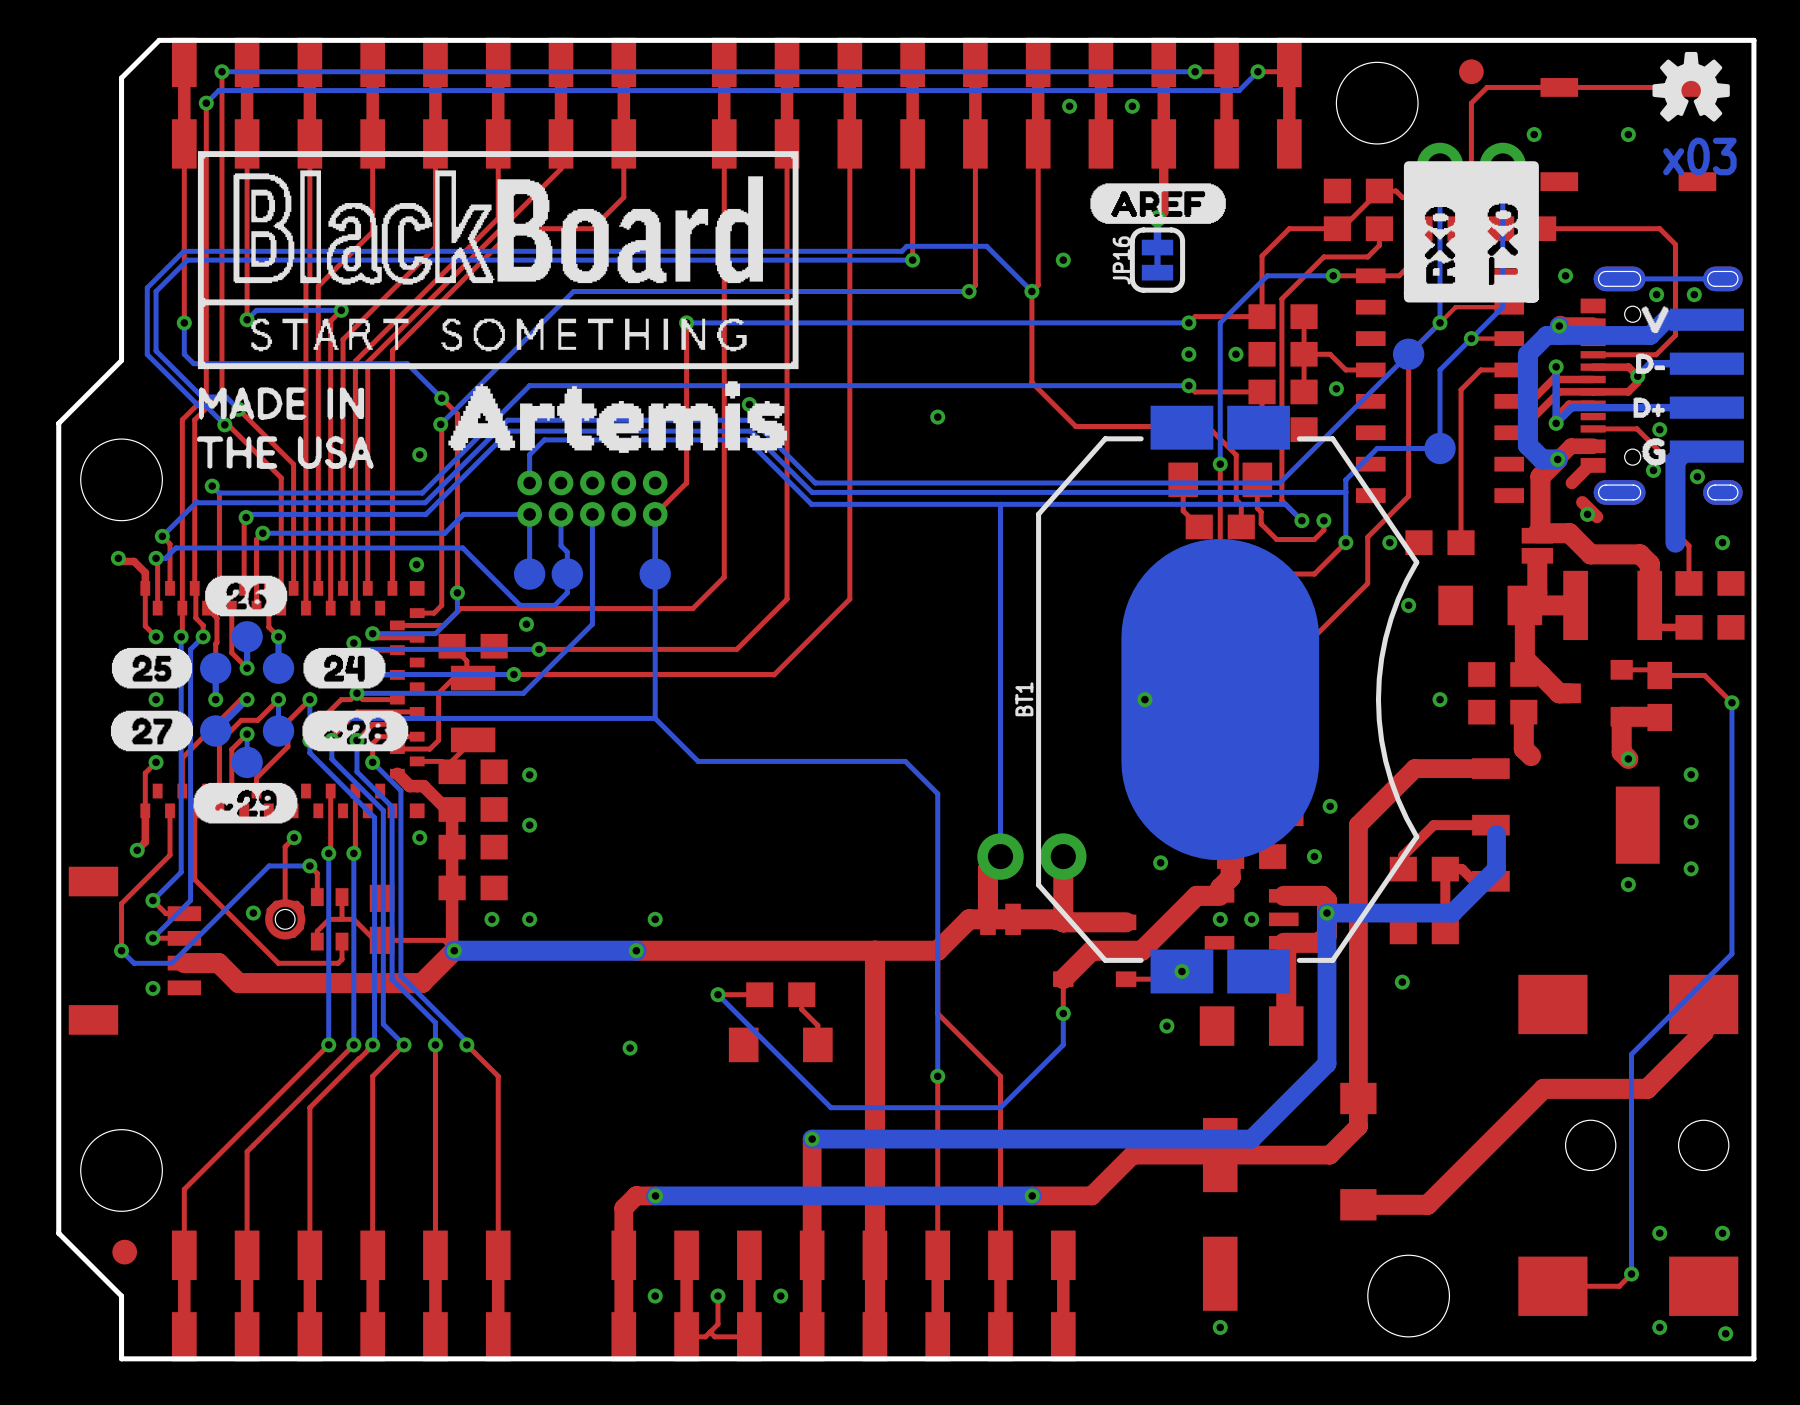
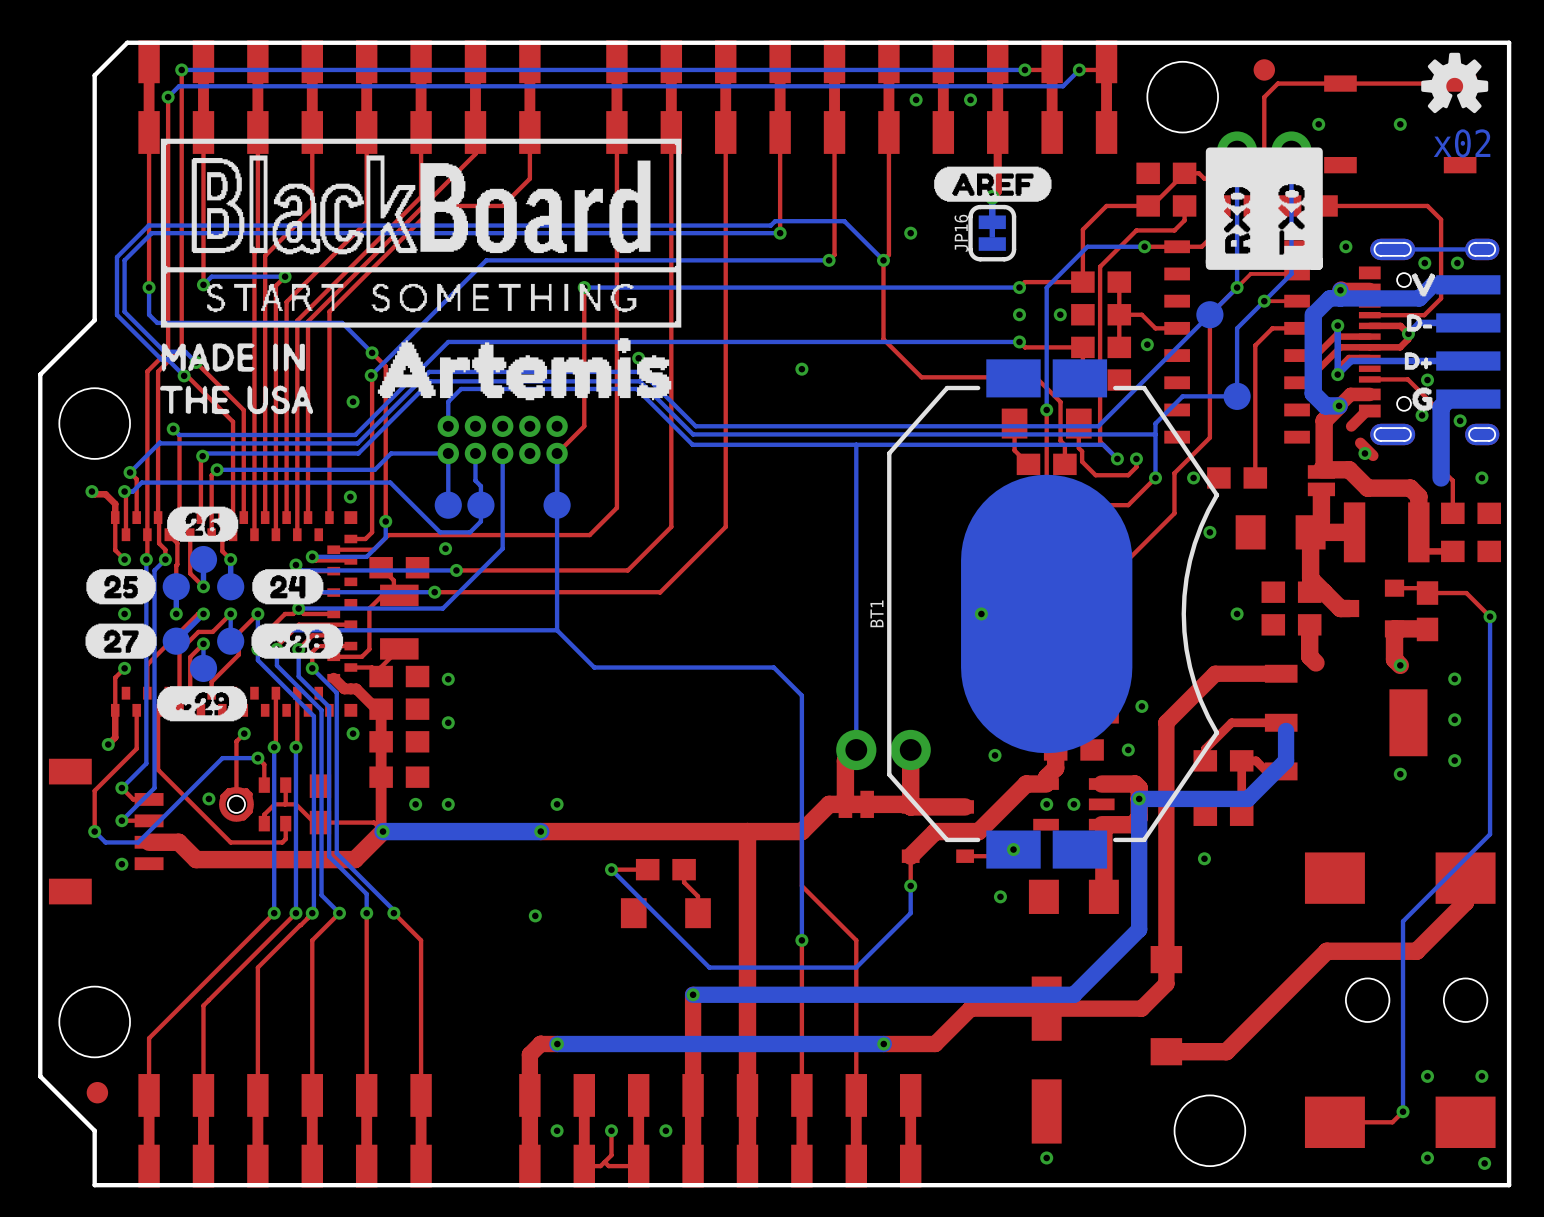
text: x03 (1699, 156) -> x02 (1462, 143)

